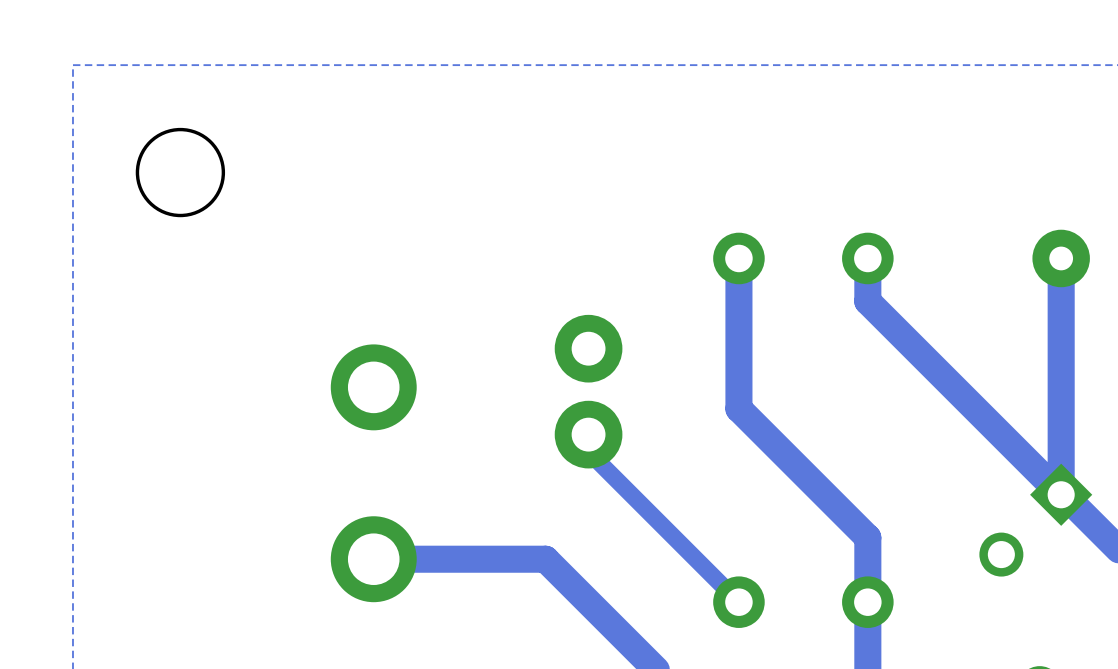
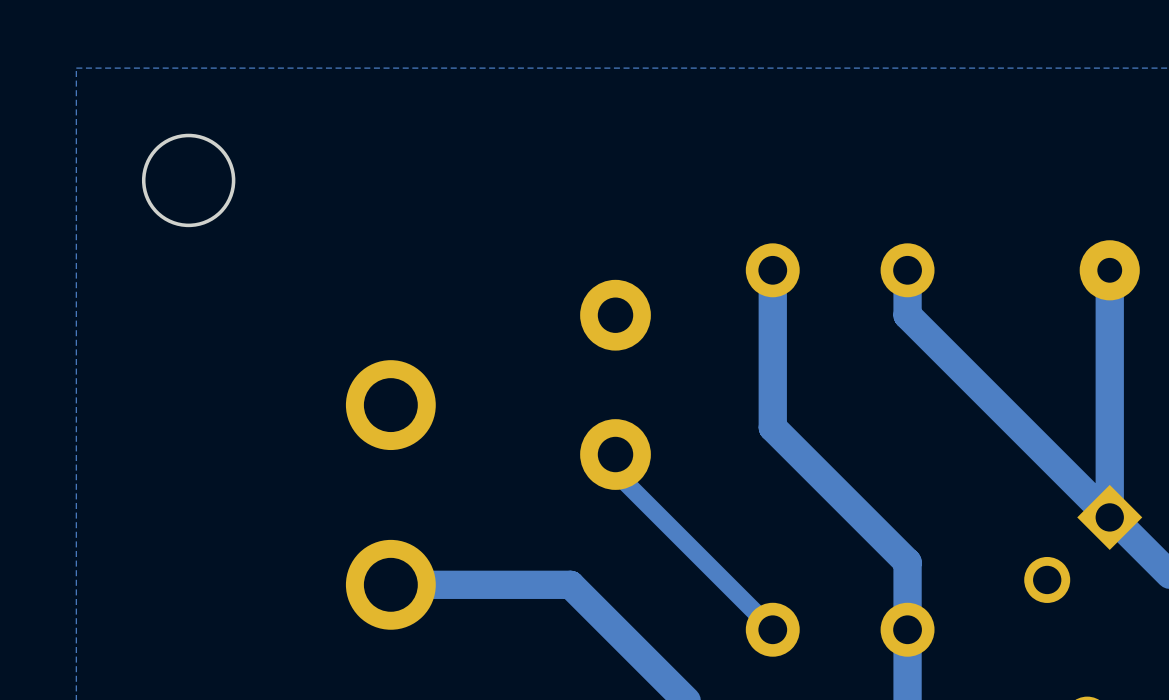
part footprint: [554, 314, 623, 469] -> [580, 279, 651, 490]

